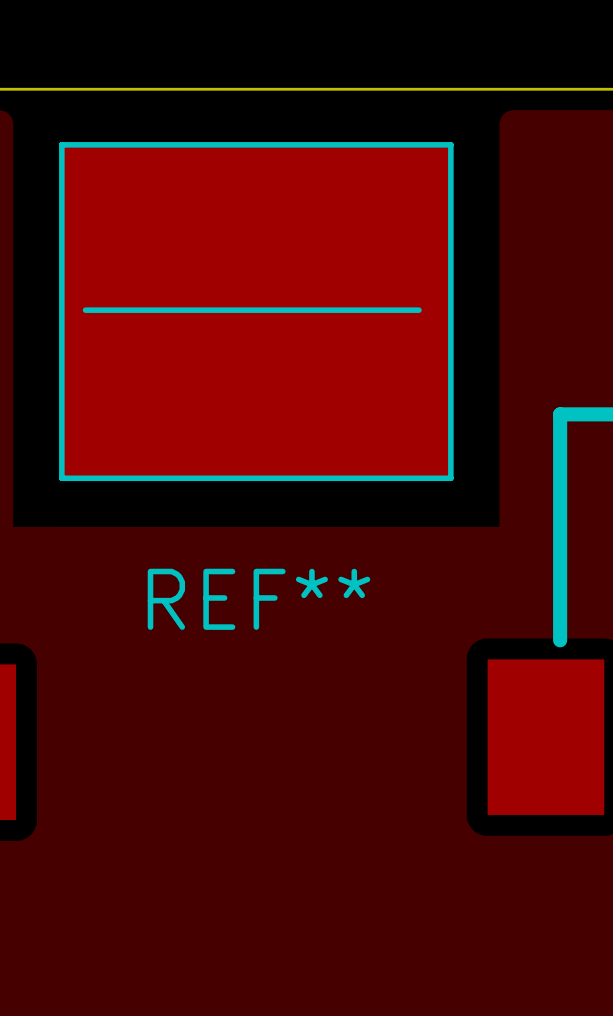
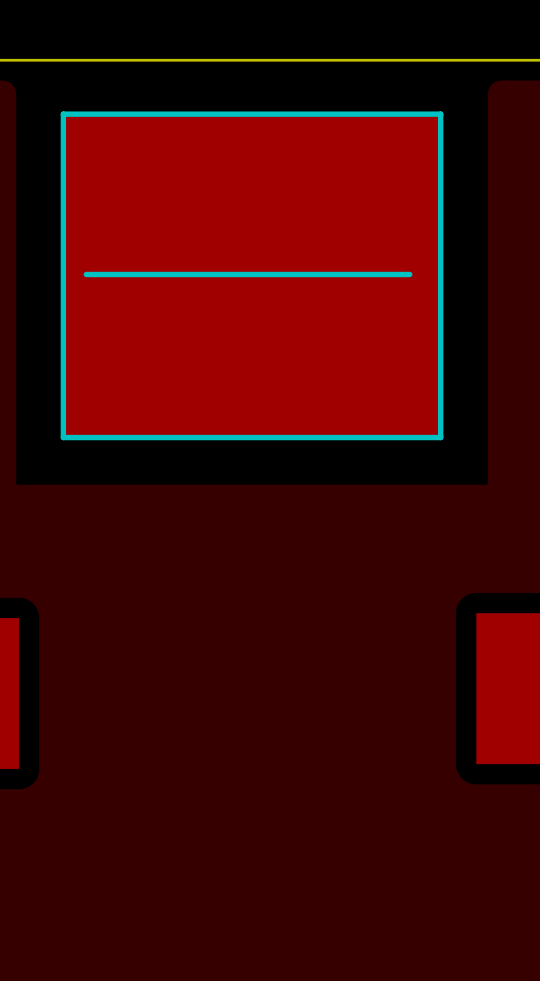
REF**: (259, 599) -> none

